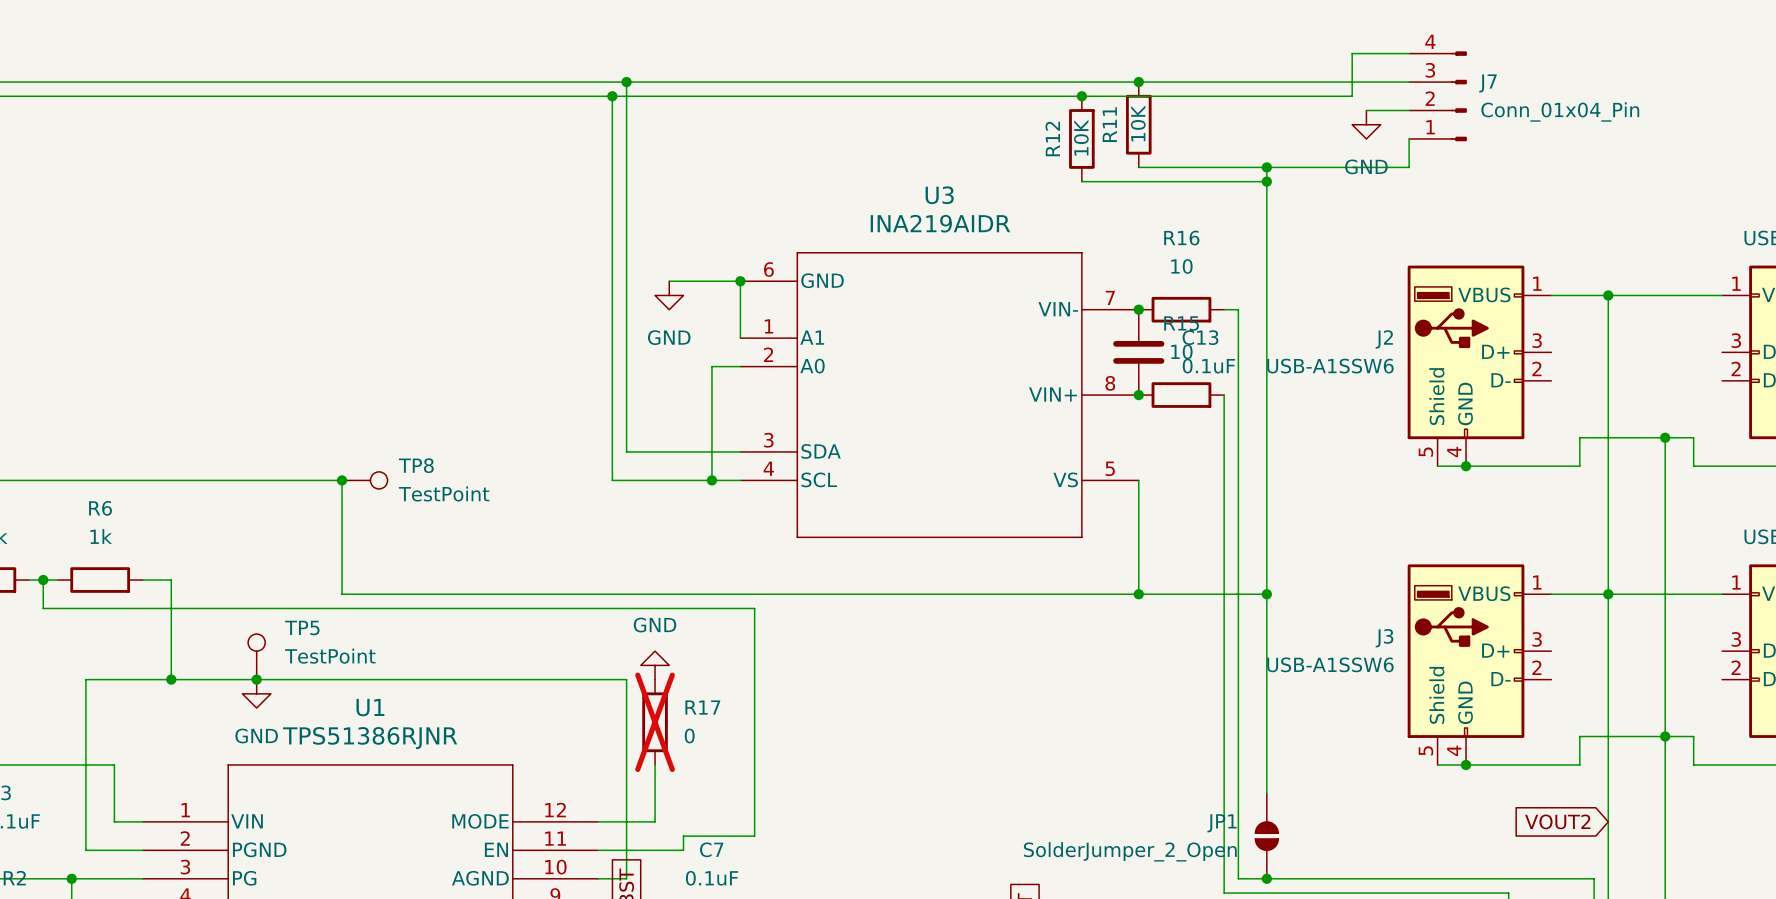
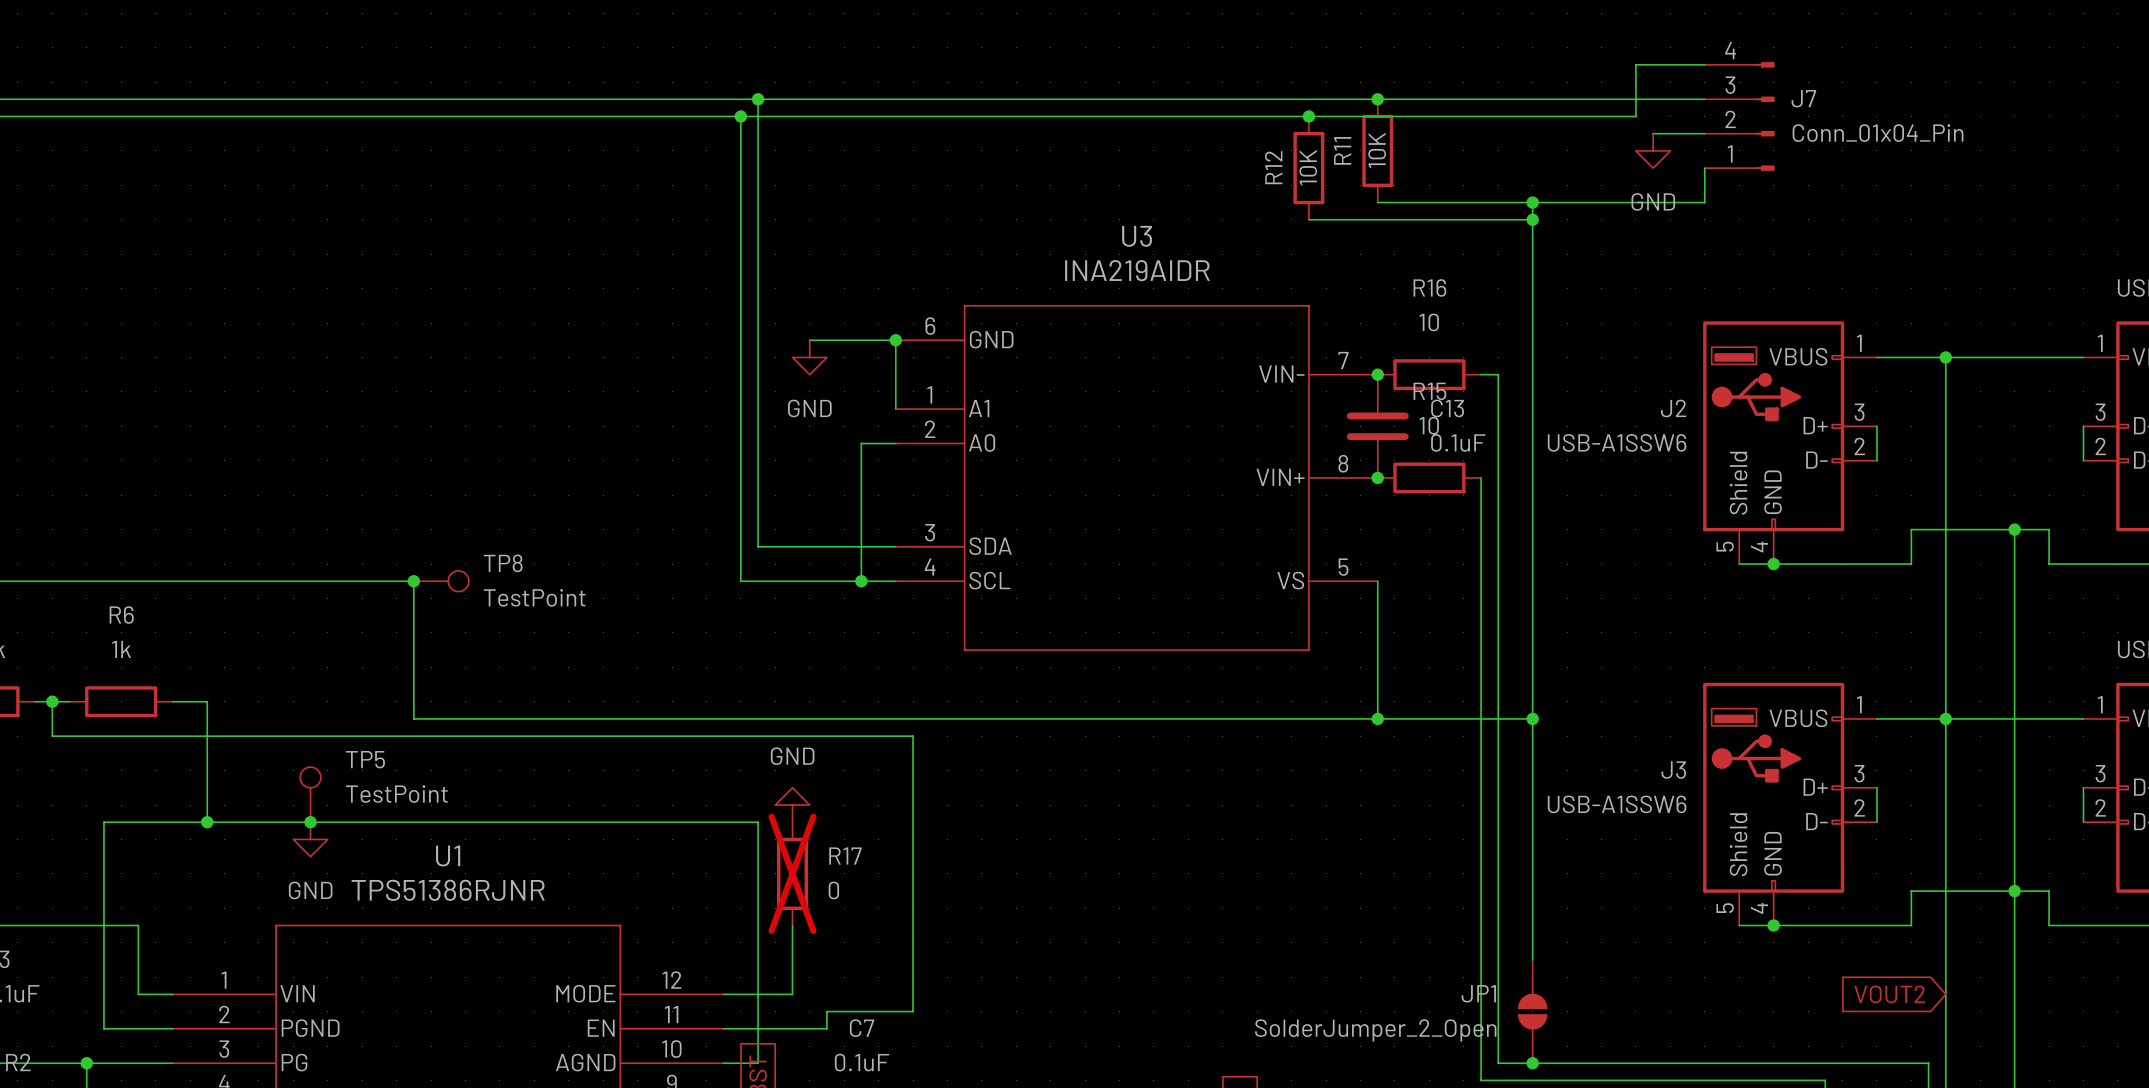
wire: none -> (1876, 426) (1876, 460)
wire: none -> (2083, 426) (2083, 460)
wire: none -> (1876, 787) (1876, 822)
wire: none -> (2083, 787) (2083, 822)

